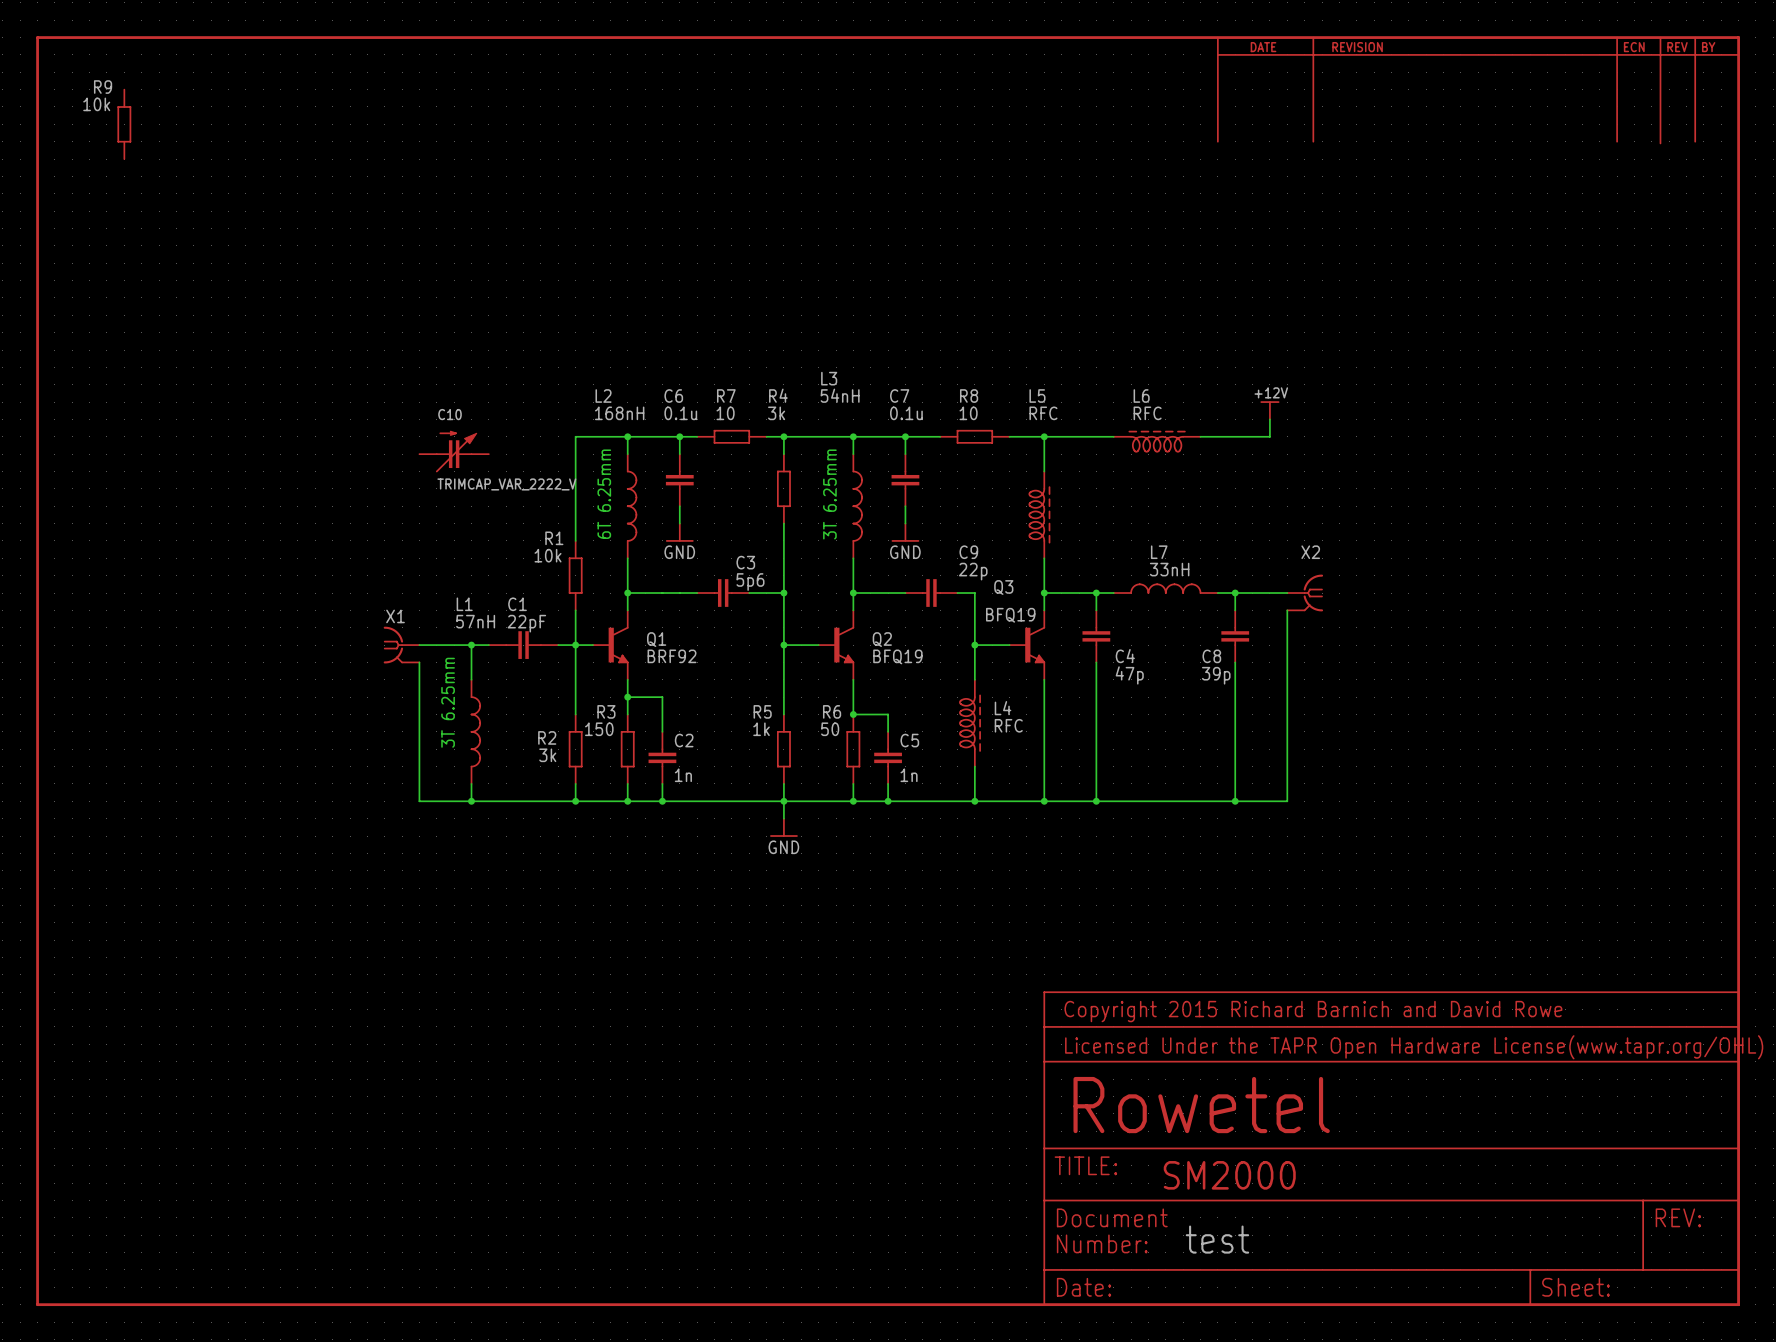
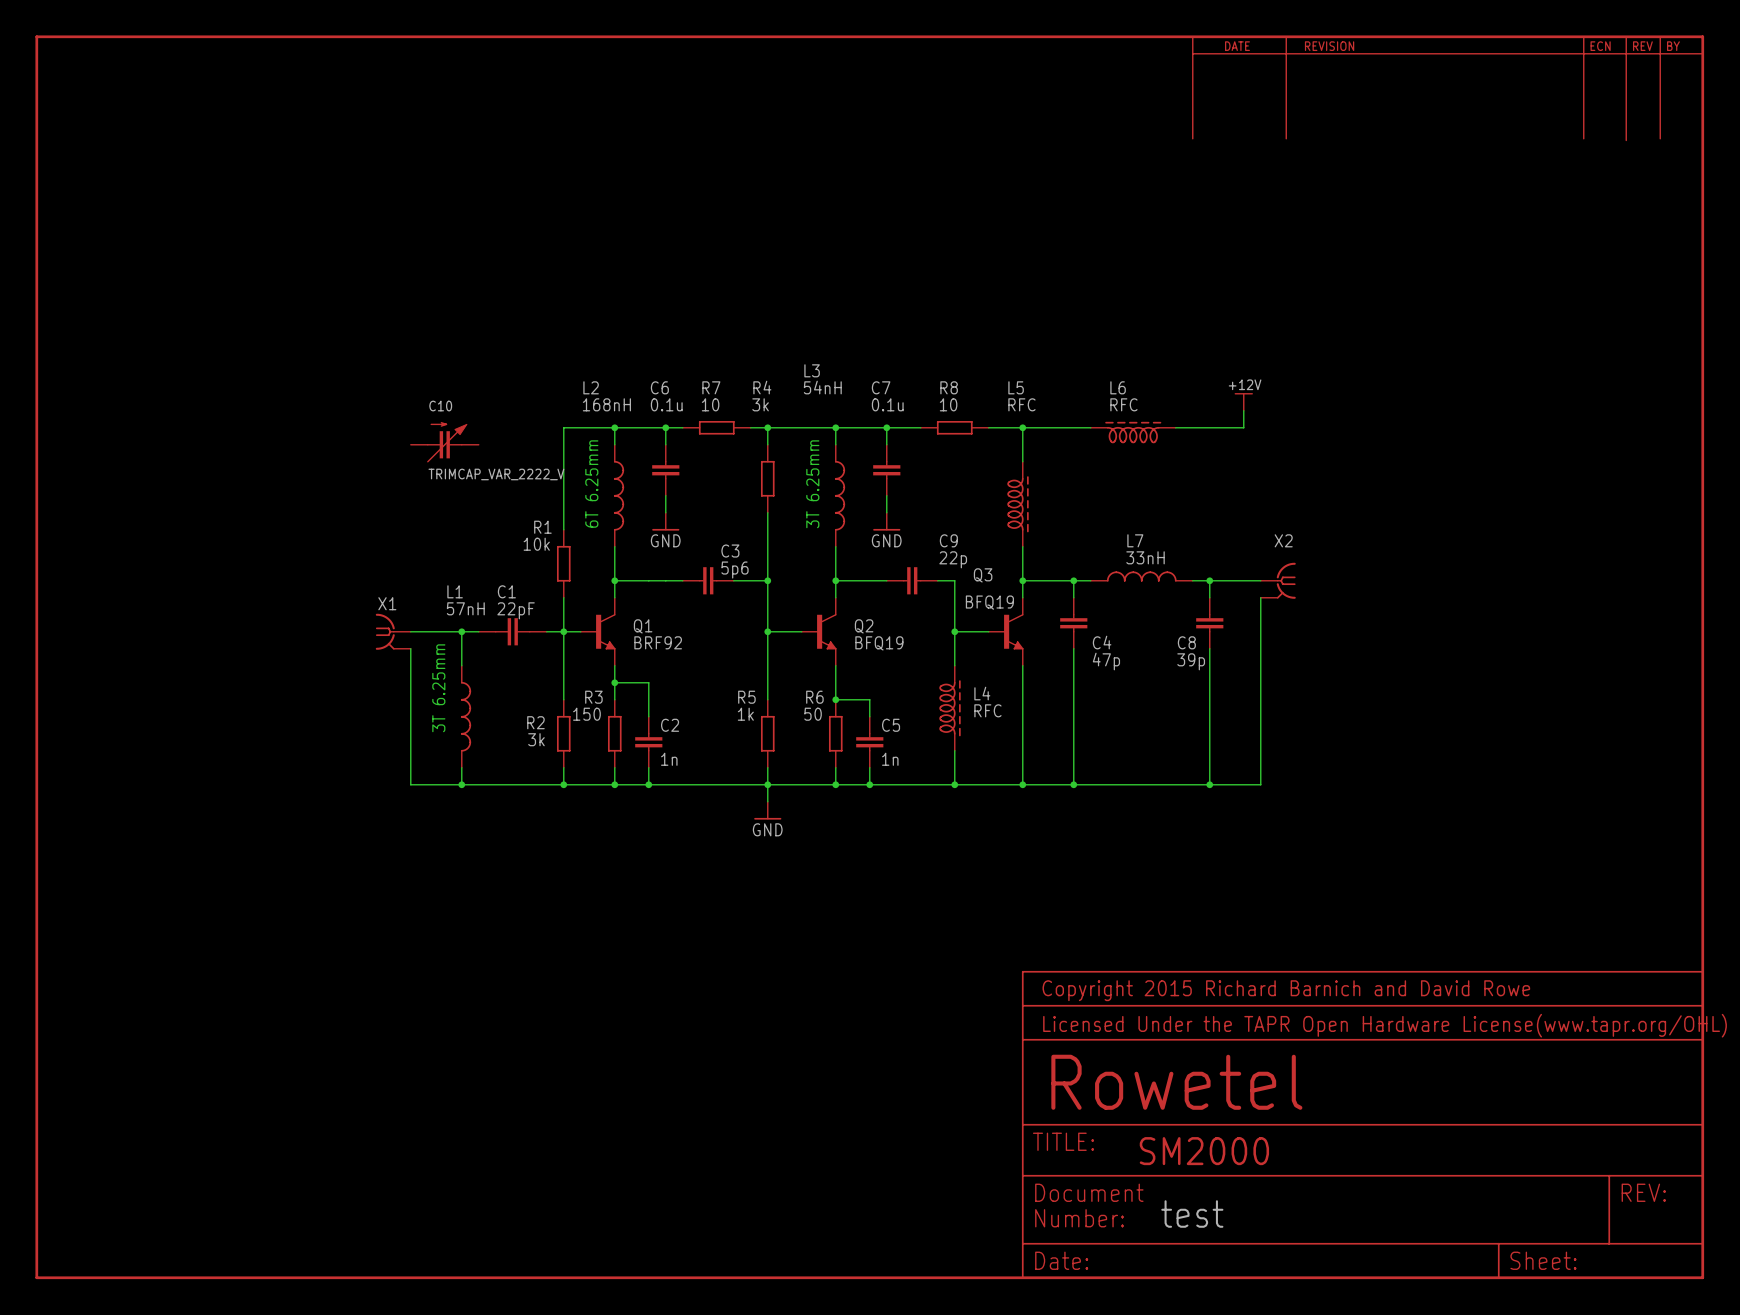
R9: 10k (124, 124) -> none

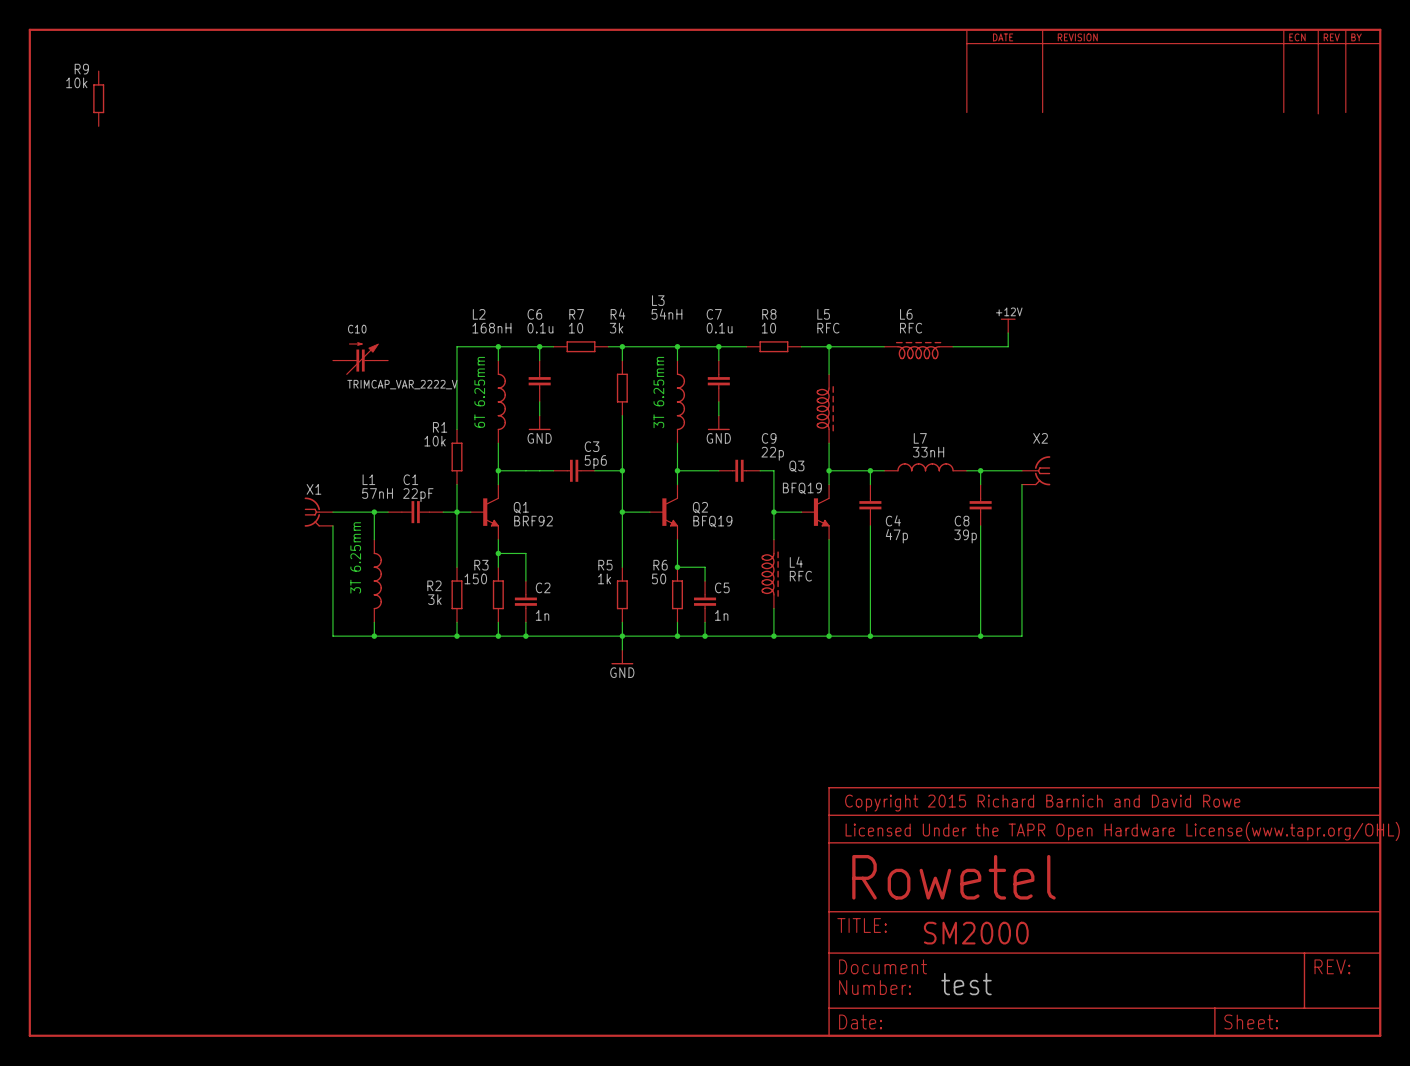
R9: none -> 10k (98, 98)

